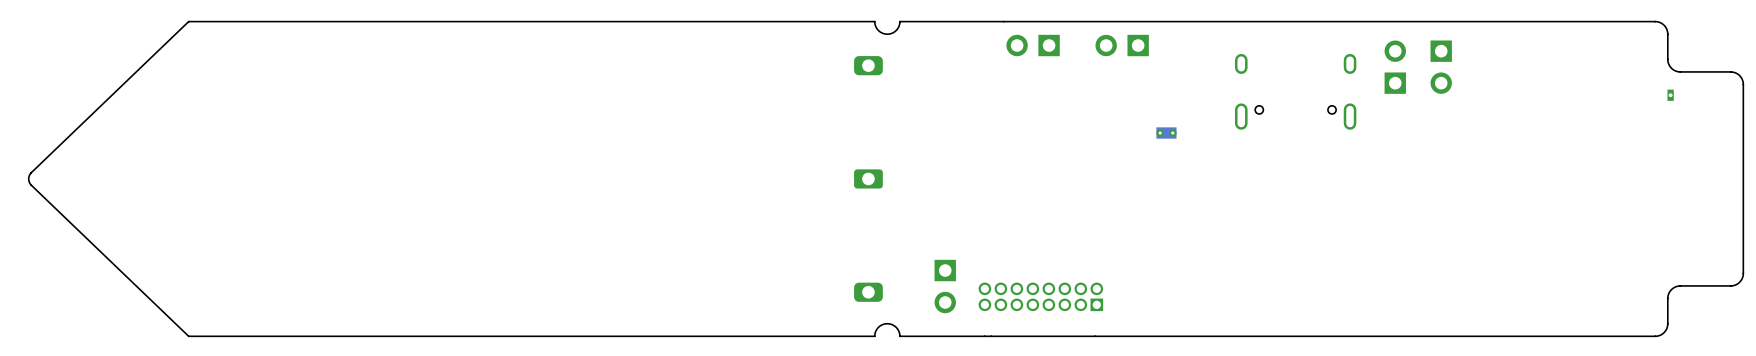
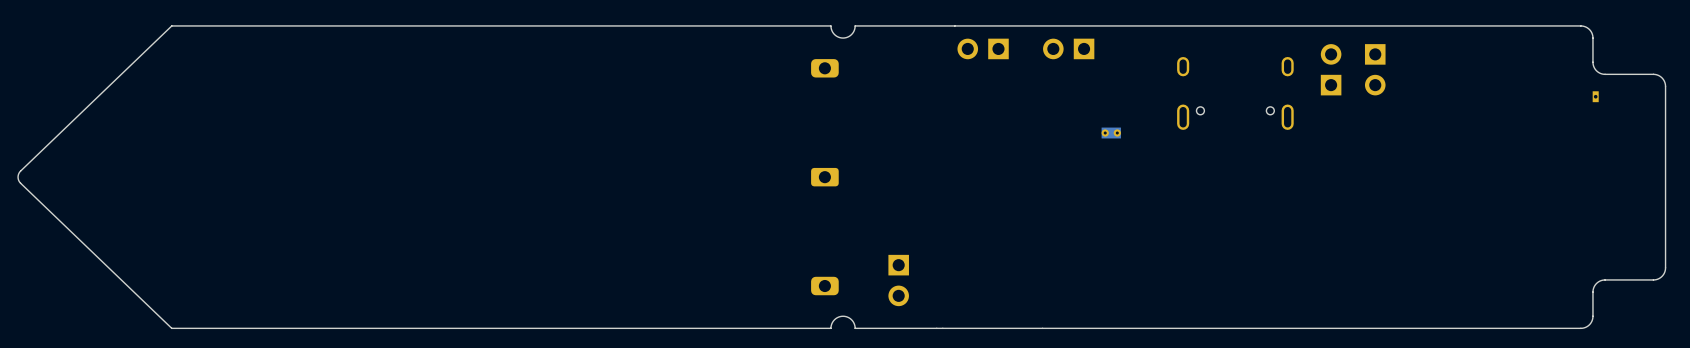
part: (1040, 296) -> none

